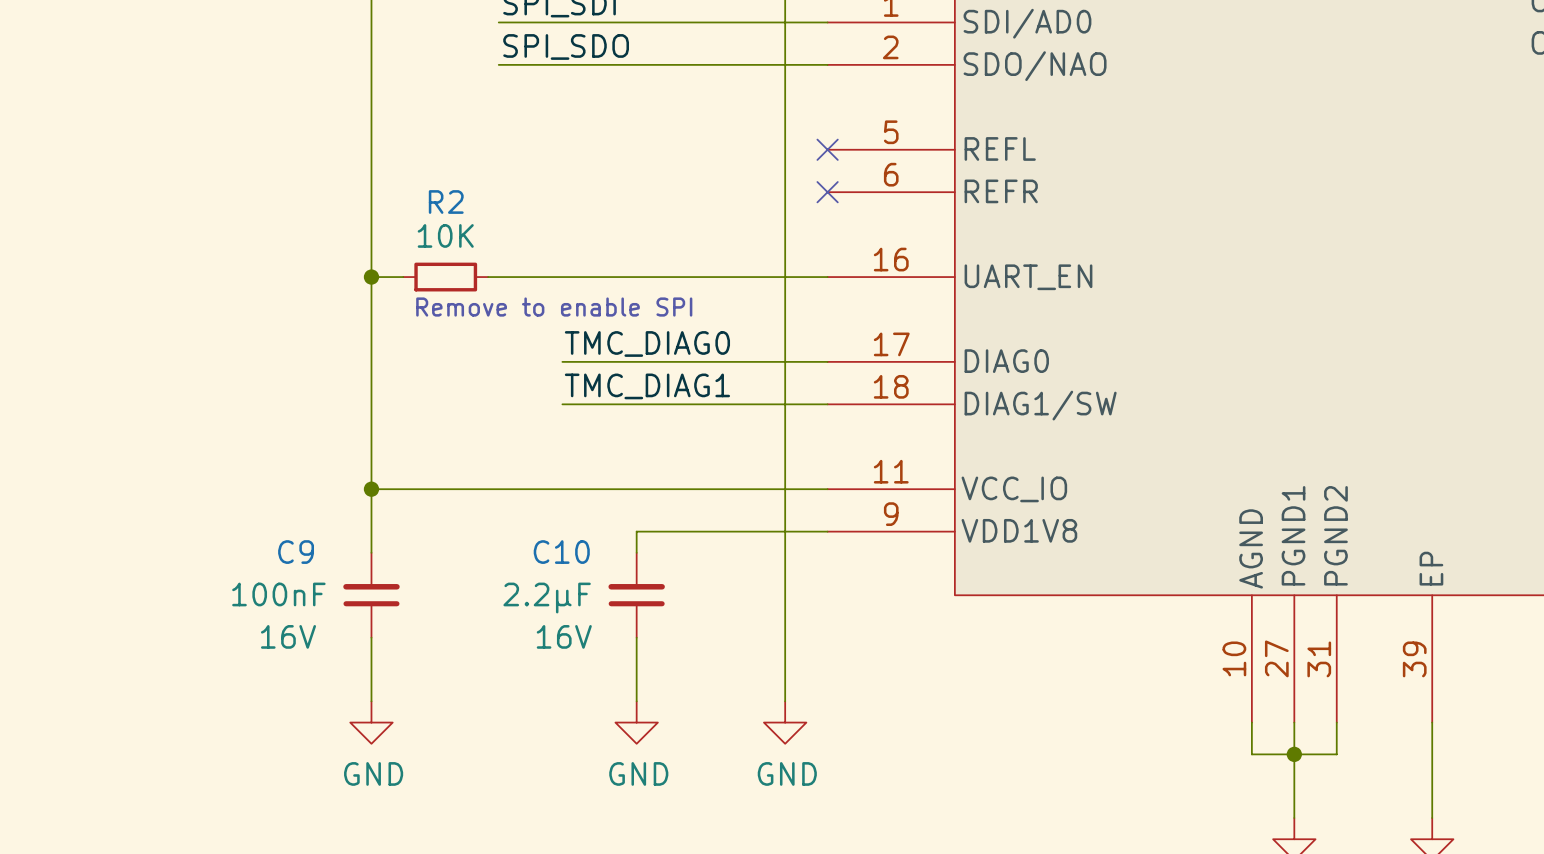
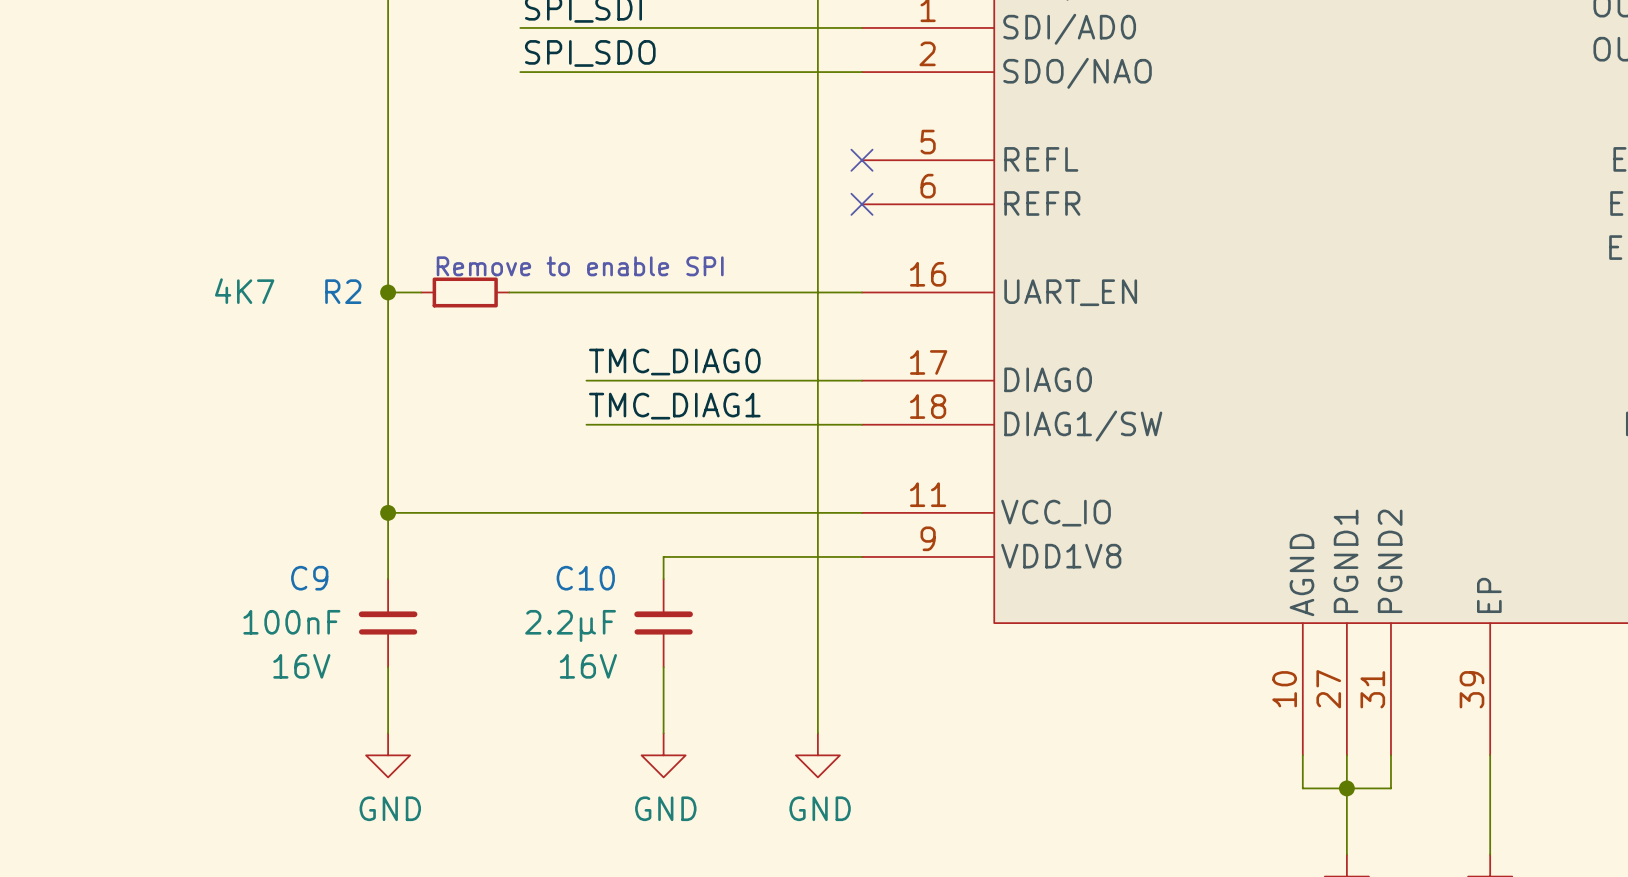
R2 name position: R2 (446, 202) -> R2 (343, 291)
R2 value: 10K (445, 235) -> 4K7 (244, 291)
text position: Remove to enable SPI (554, 307) -> Remove to enable SPI (580, 266)

